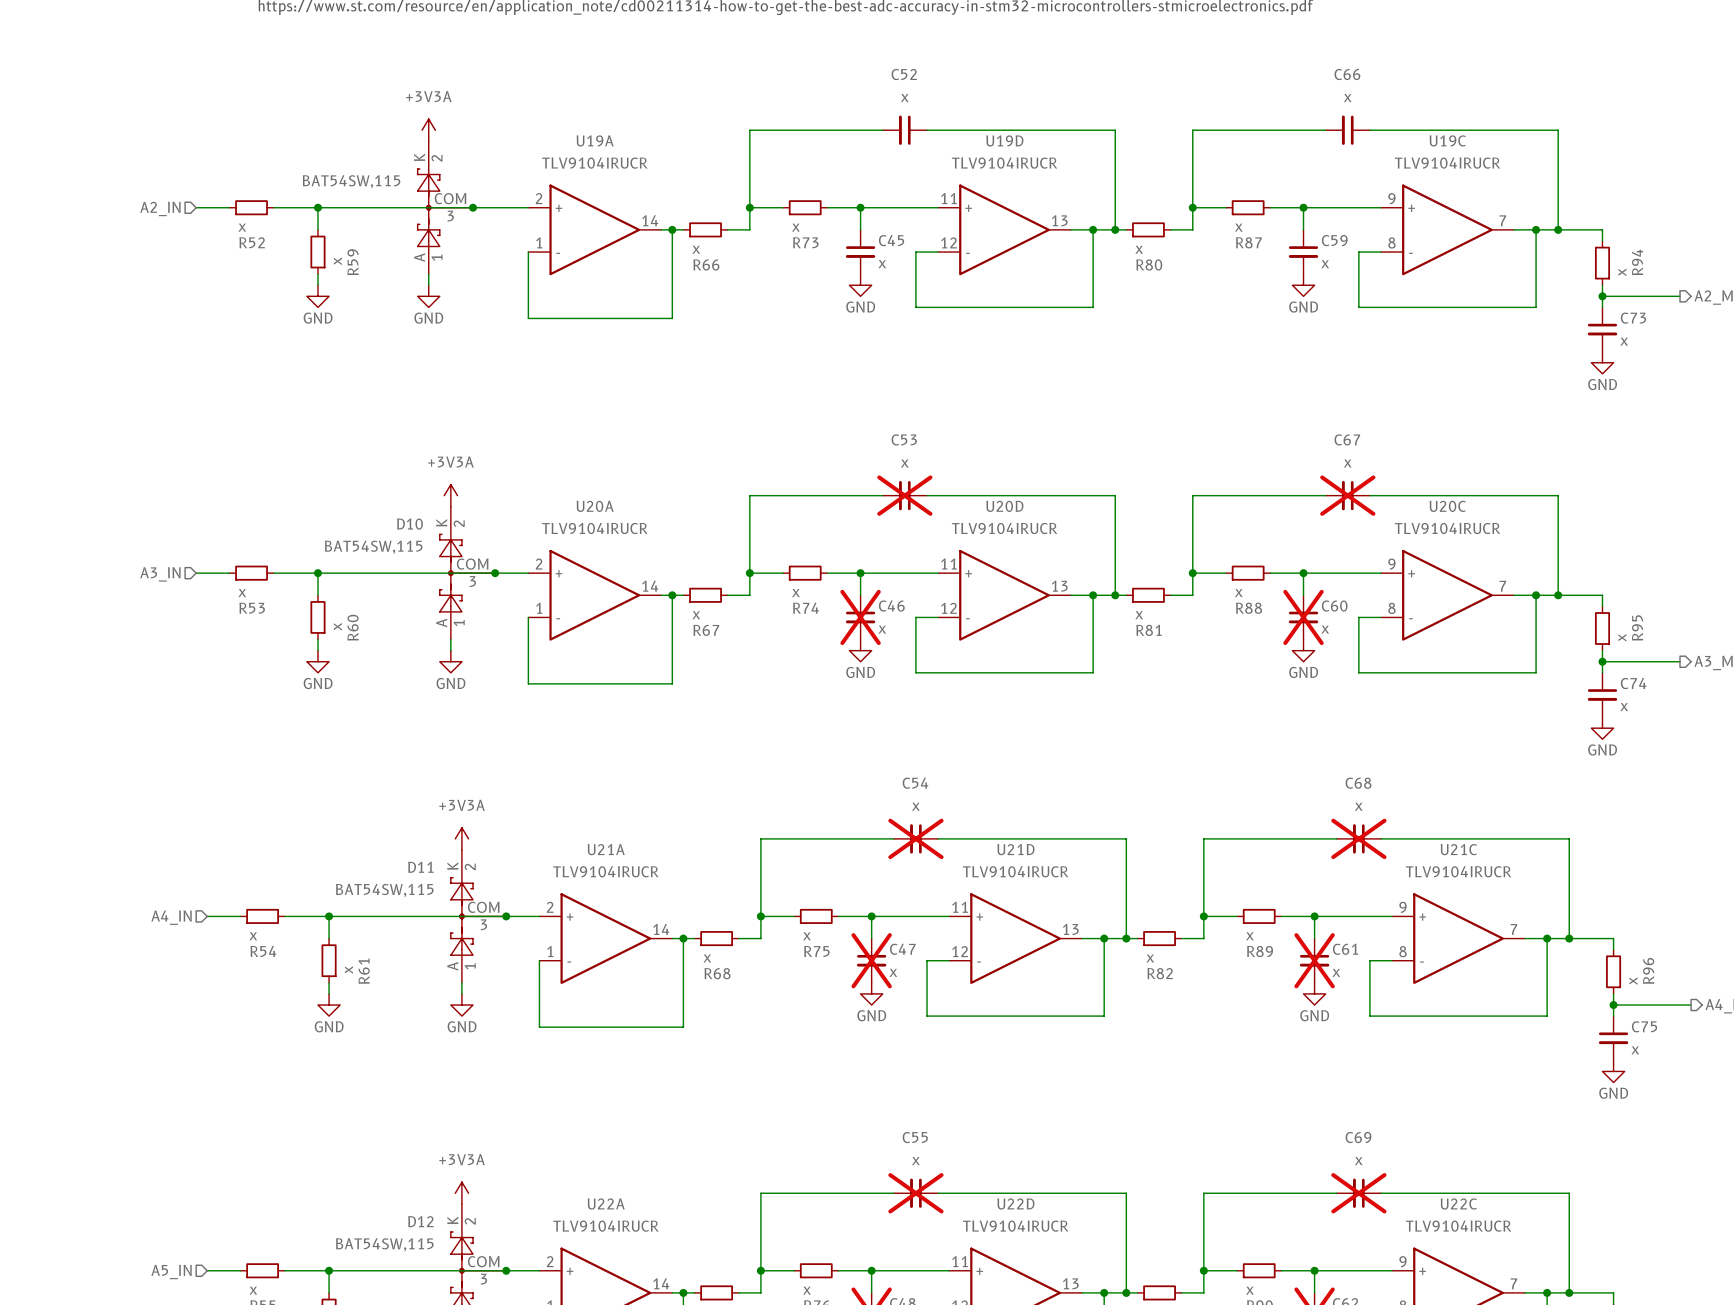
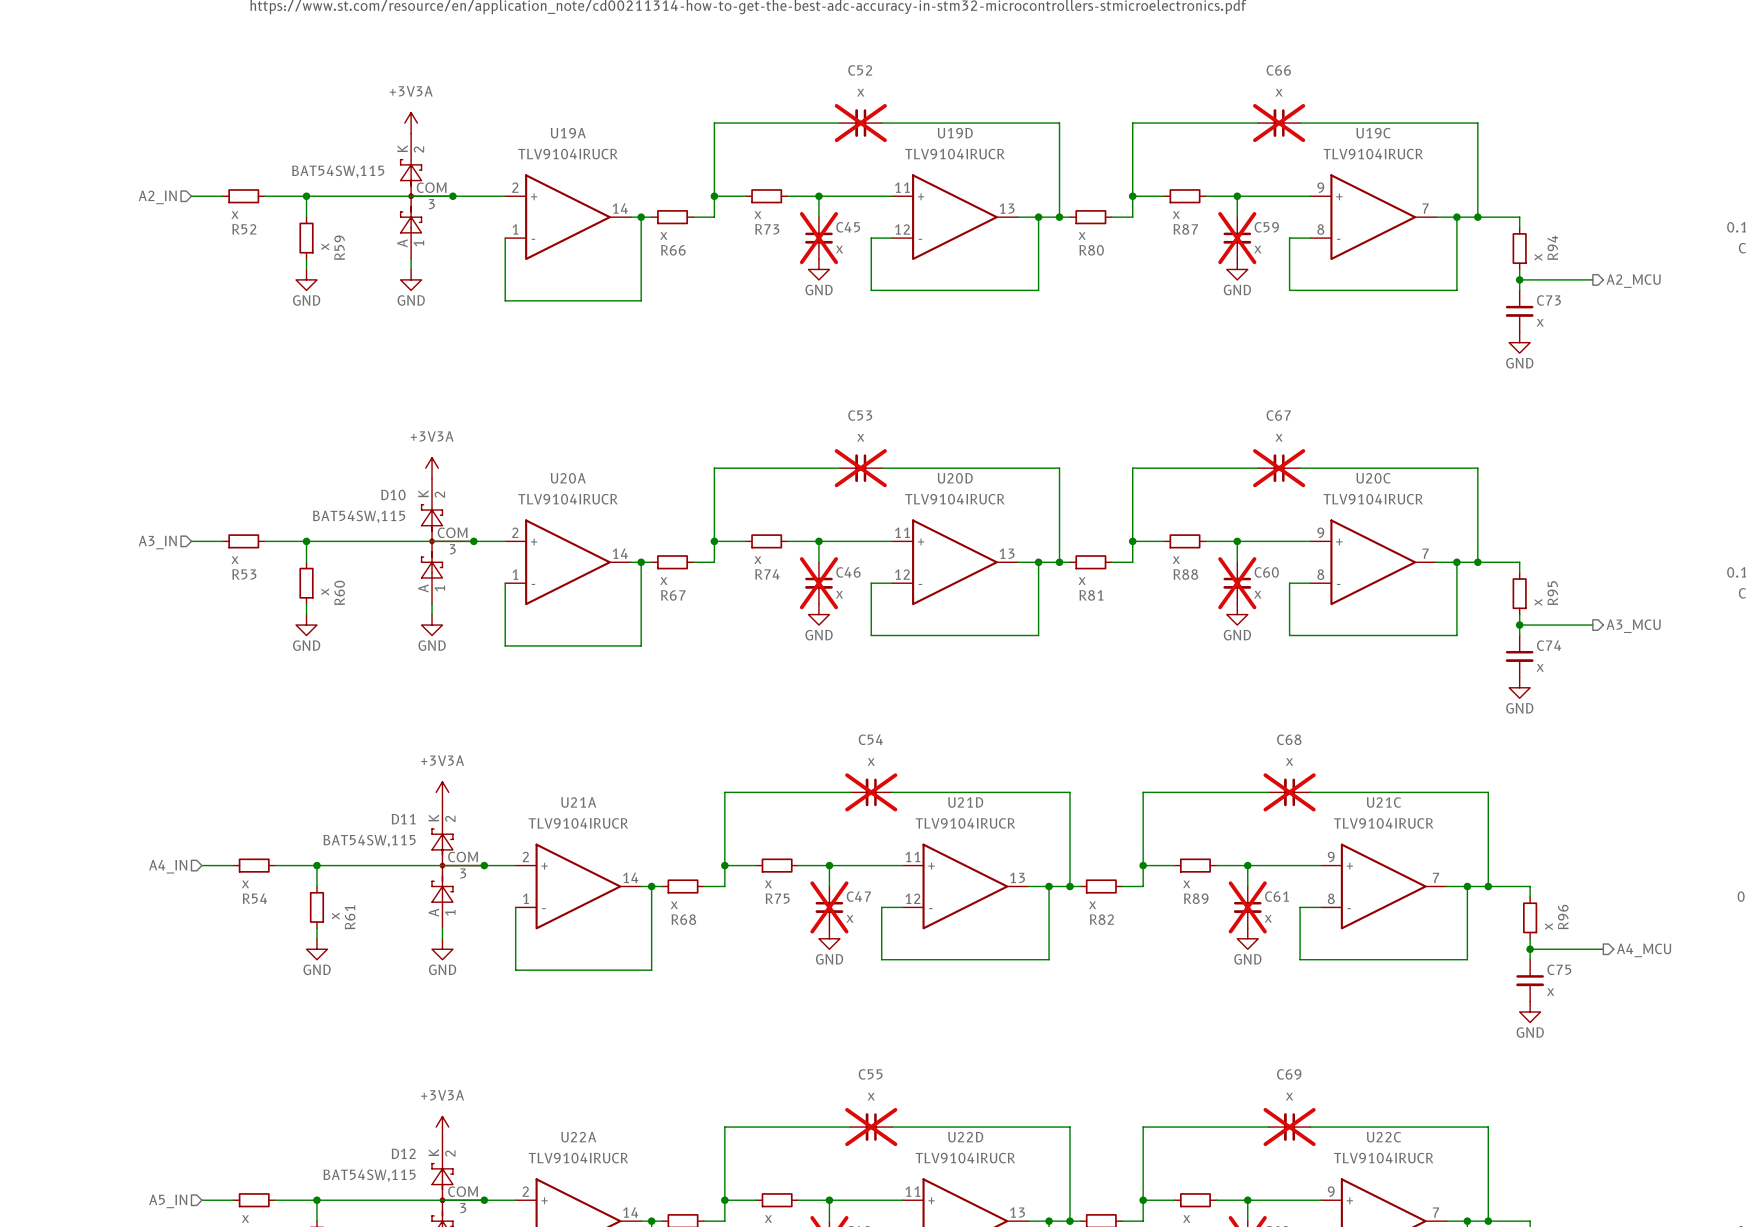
C52 do-not-place cross: none -> (860, 123)
C66 do-not-place cross: none -> (1279, 123)
C45 do-not-place cross: none -> (818, 238)
C59 do-not-place cross: none -> (1237, 238)

